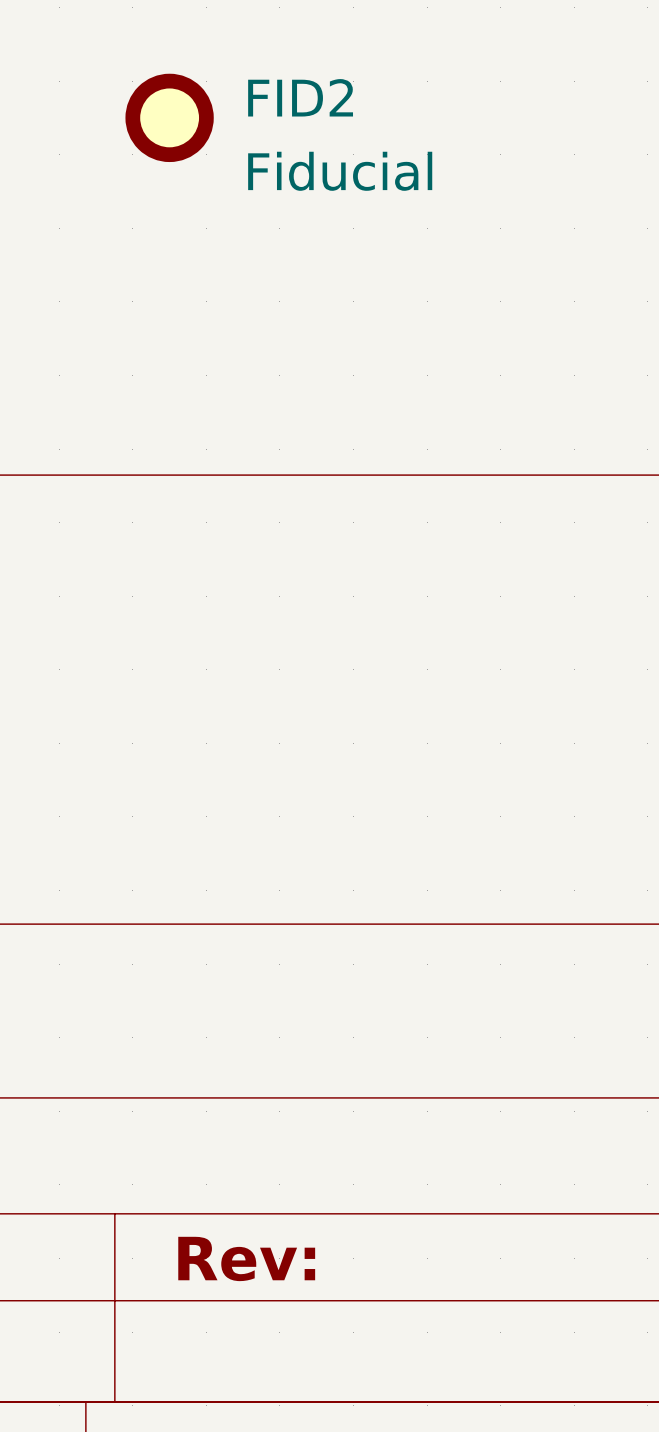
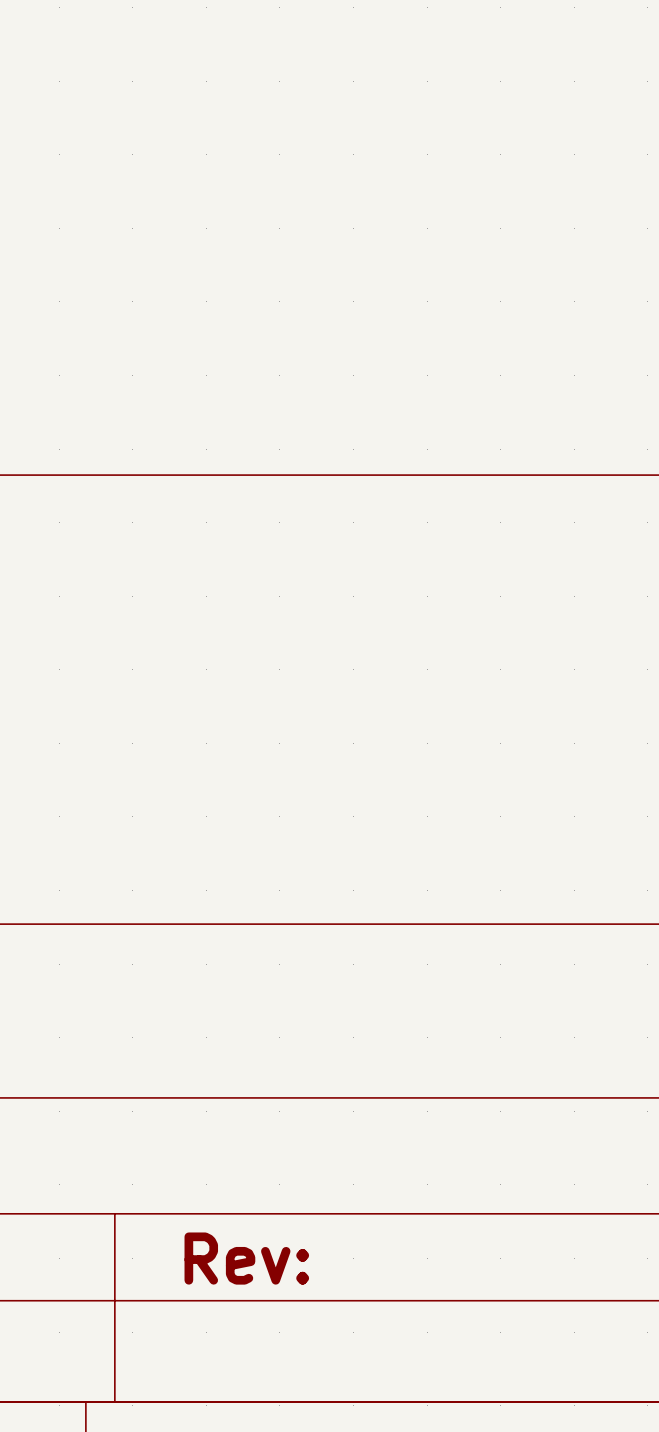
FID2: Fiducial (169, 117) -> none

